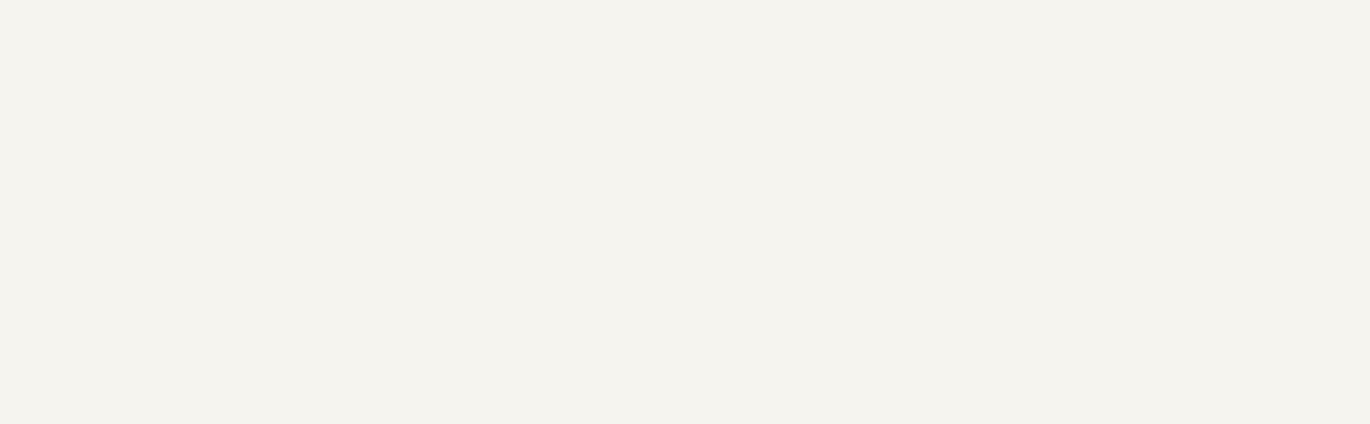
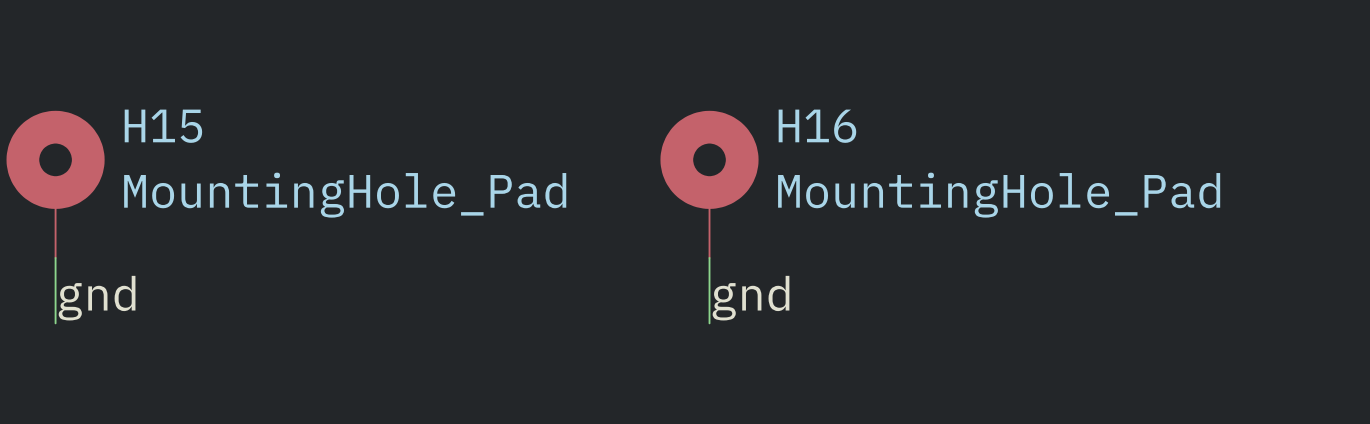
H15: none -> MountingHole_Pad (55, 184)
H16: none -> MountingHole_Pad (709, 184)
wire: none -> (55, 257) (55, 323)
wire: none -> (709, 257) (709, 323)
label: none -> gnd (97, 298)
label: none -> gnd (751, 298)

